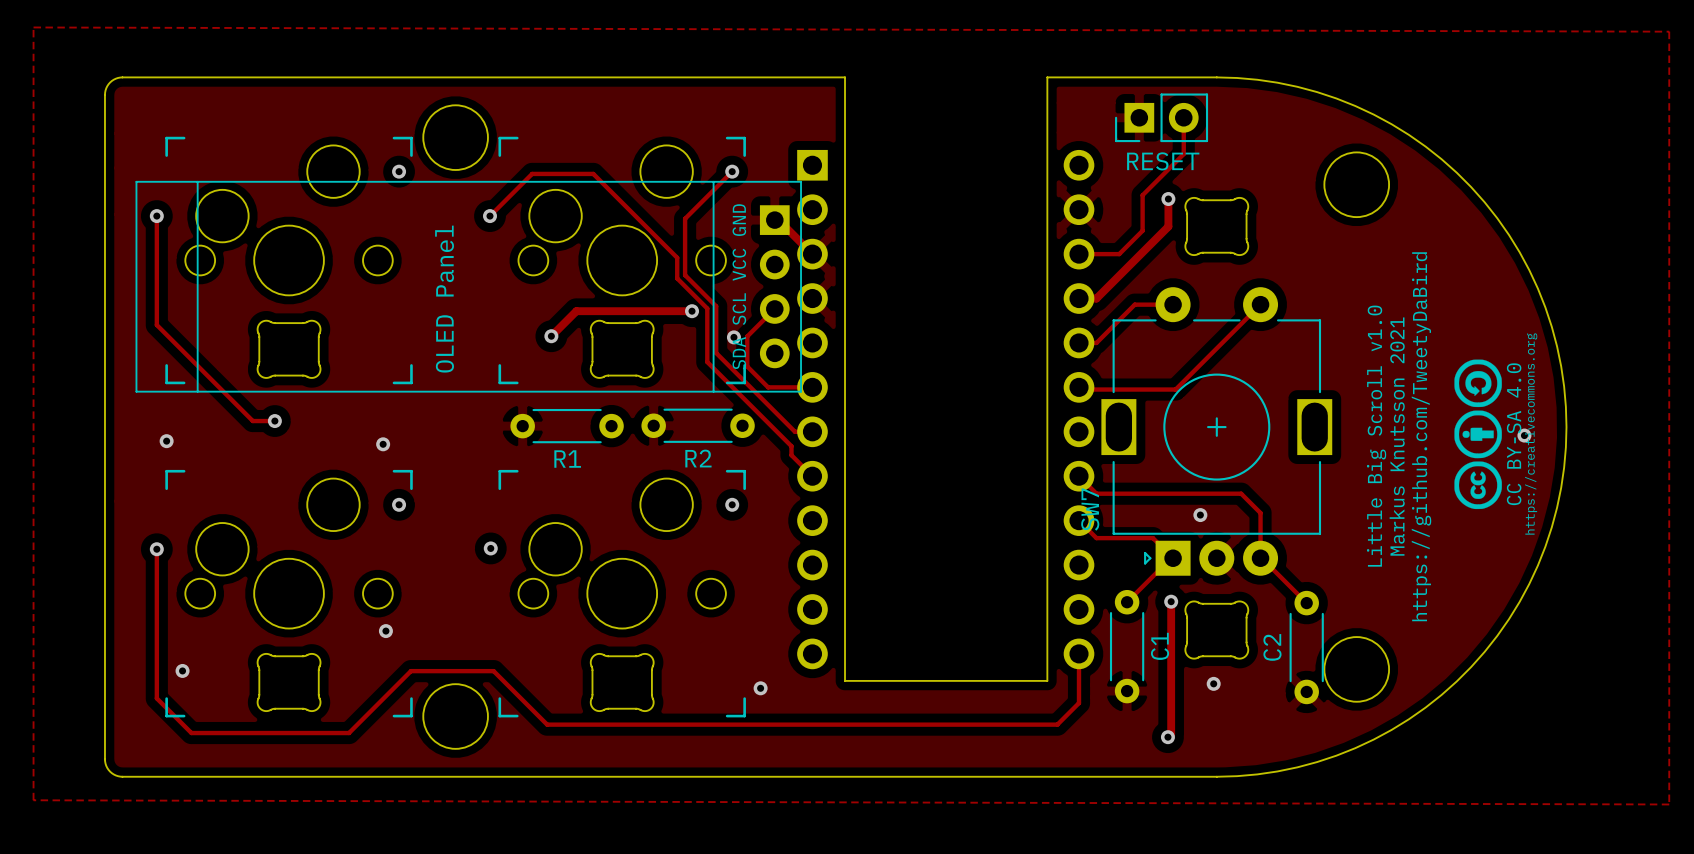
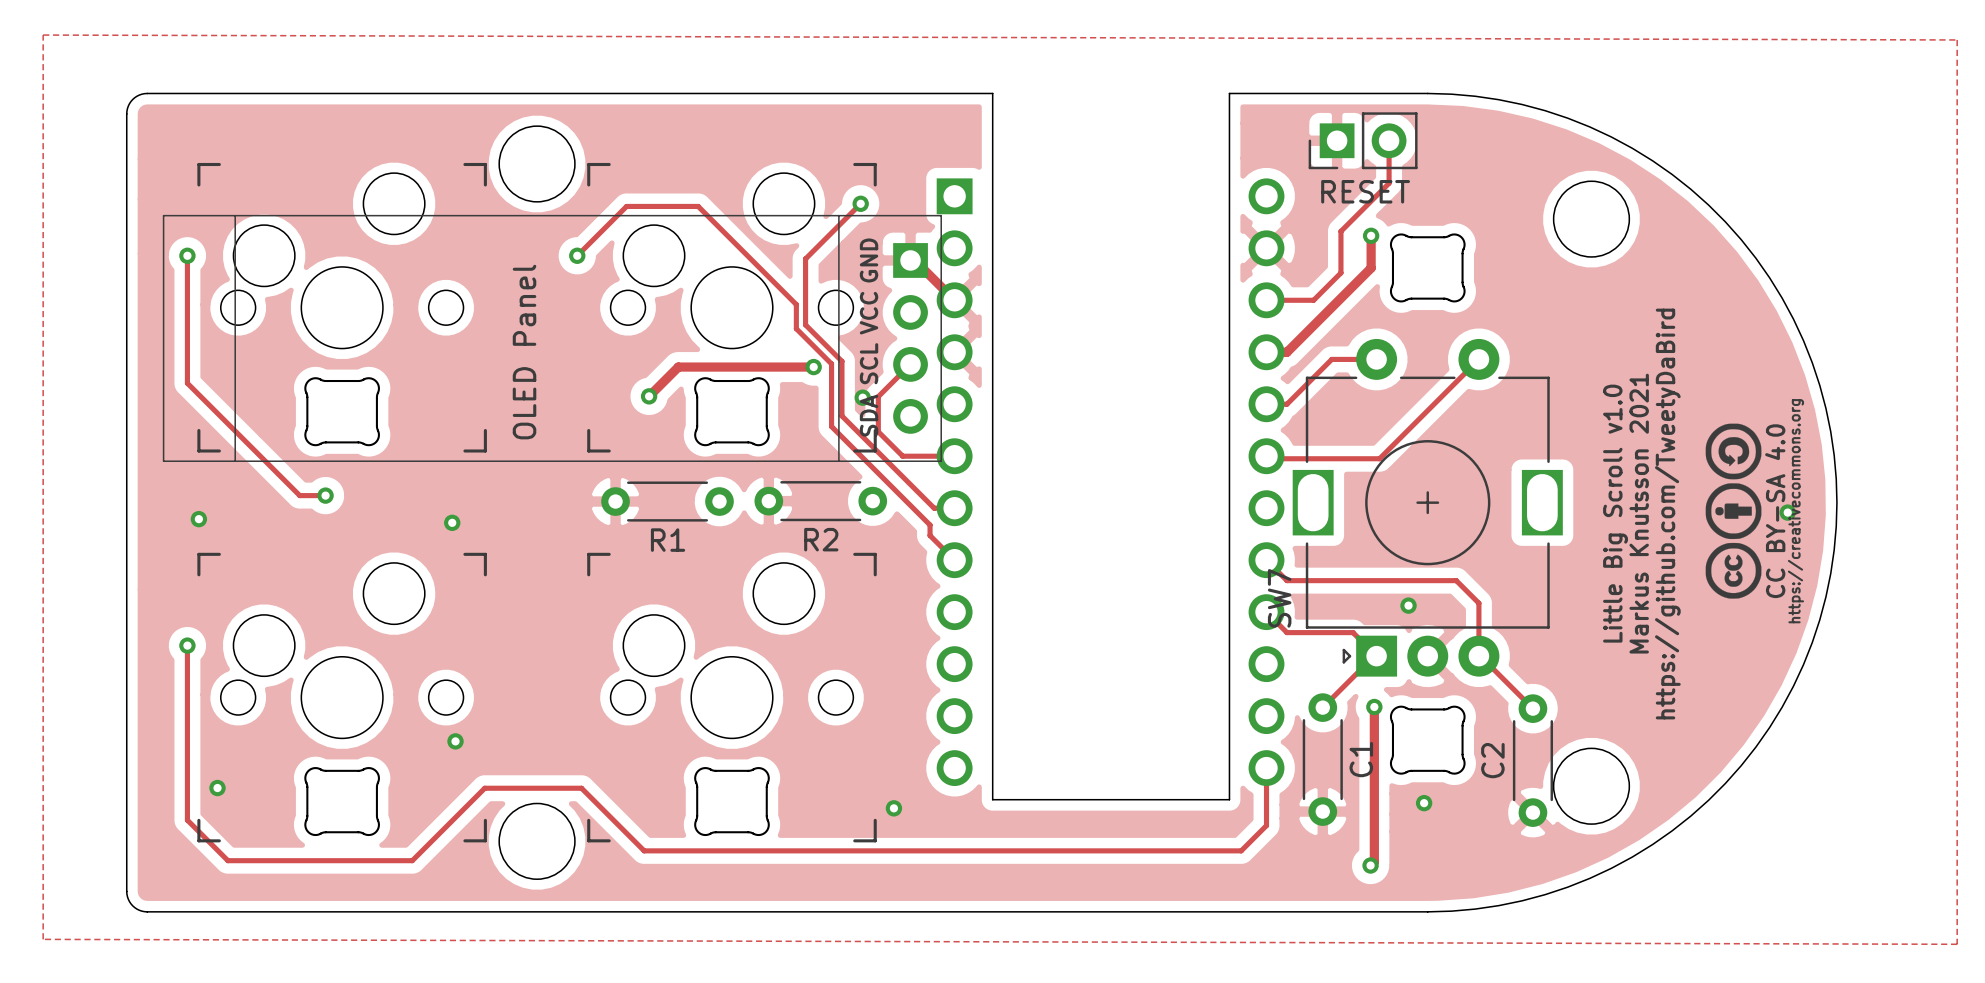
via: (399, 171) -> none
via: (399, 504) -> none
via: (732, 504) -> none
via: (490, 548) -> none

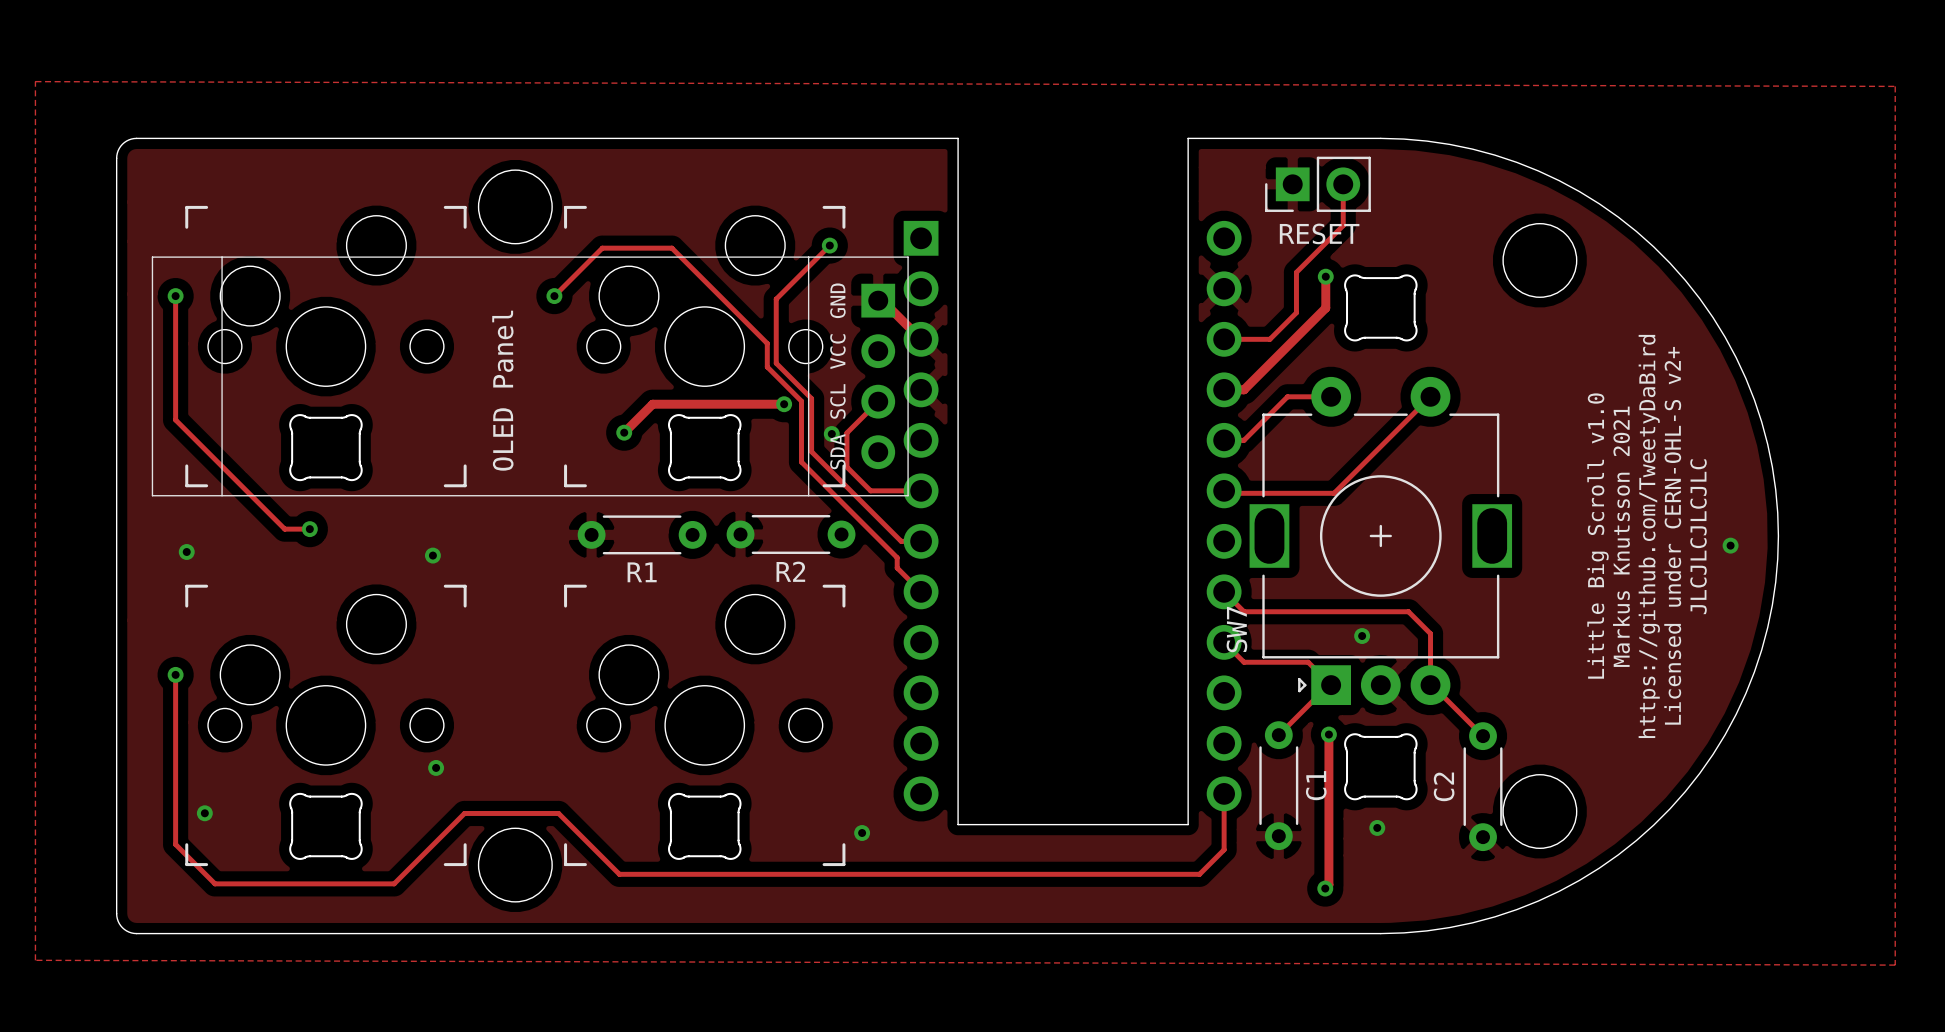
drawing: [1705, 423, 1762, 599] -> none
text: none -> Licensed under CERN-OHL-S v2+ (1672, 535)
text: none -> JLCJLCJLCJLC (1698, 536)
text position: Little Big Scroll v1.0 (1615, 513) -> Little Big Scroll v1.0 (1598, 536)
text position: Markus Knutsson 2021 (1639, 513) -> Markus Knutsson 2021 (1621, 536)
text position: https://github.com/TweetyDaBird (1667, 514) -> https://github.com/TweetyDaBird (1649, 536)

